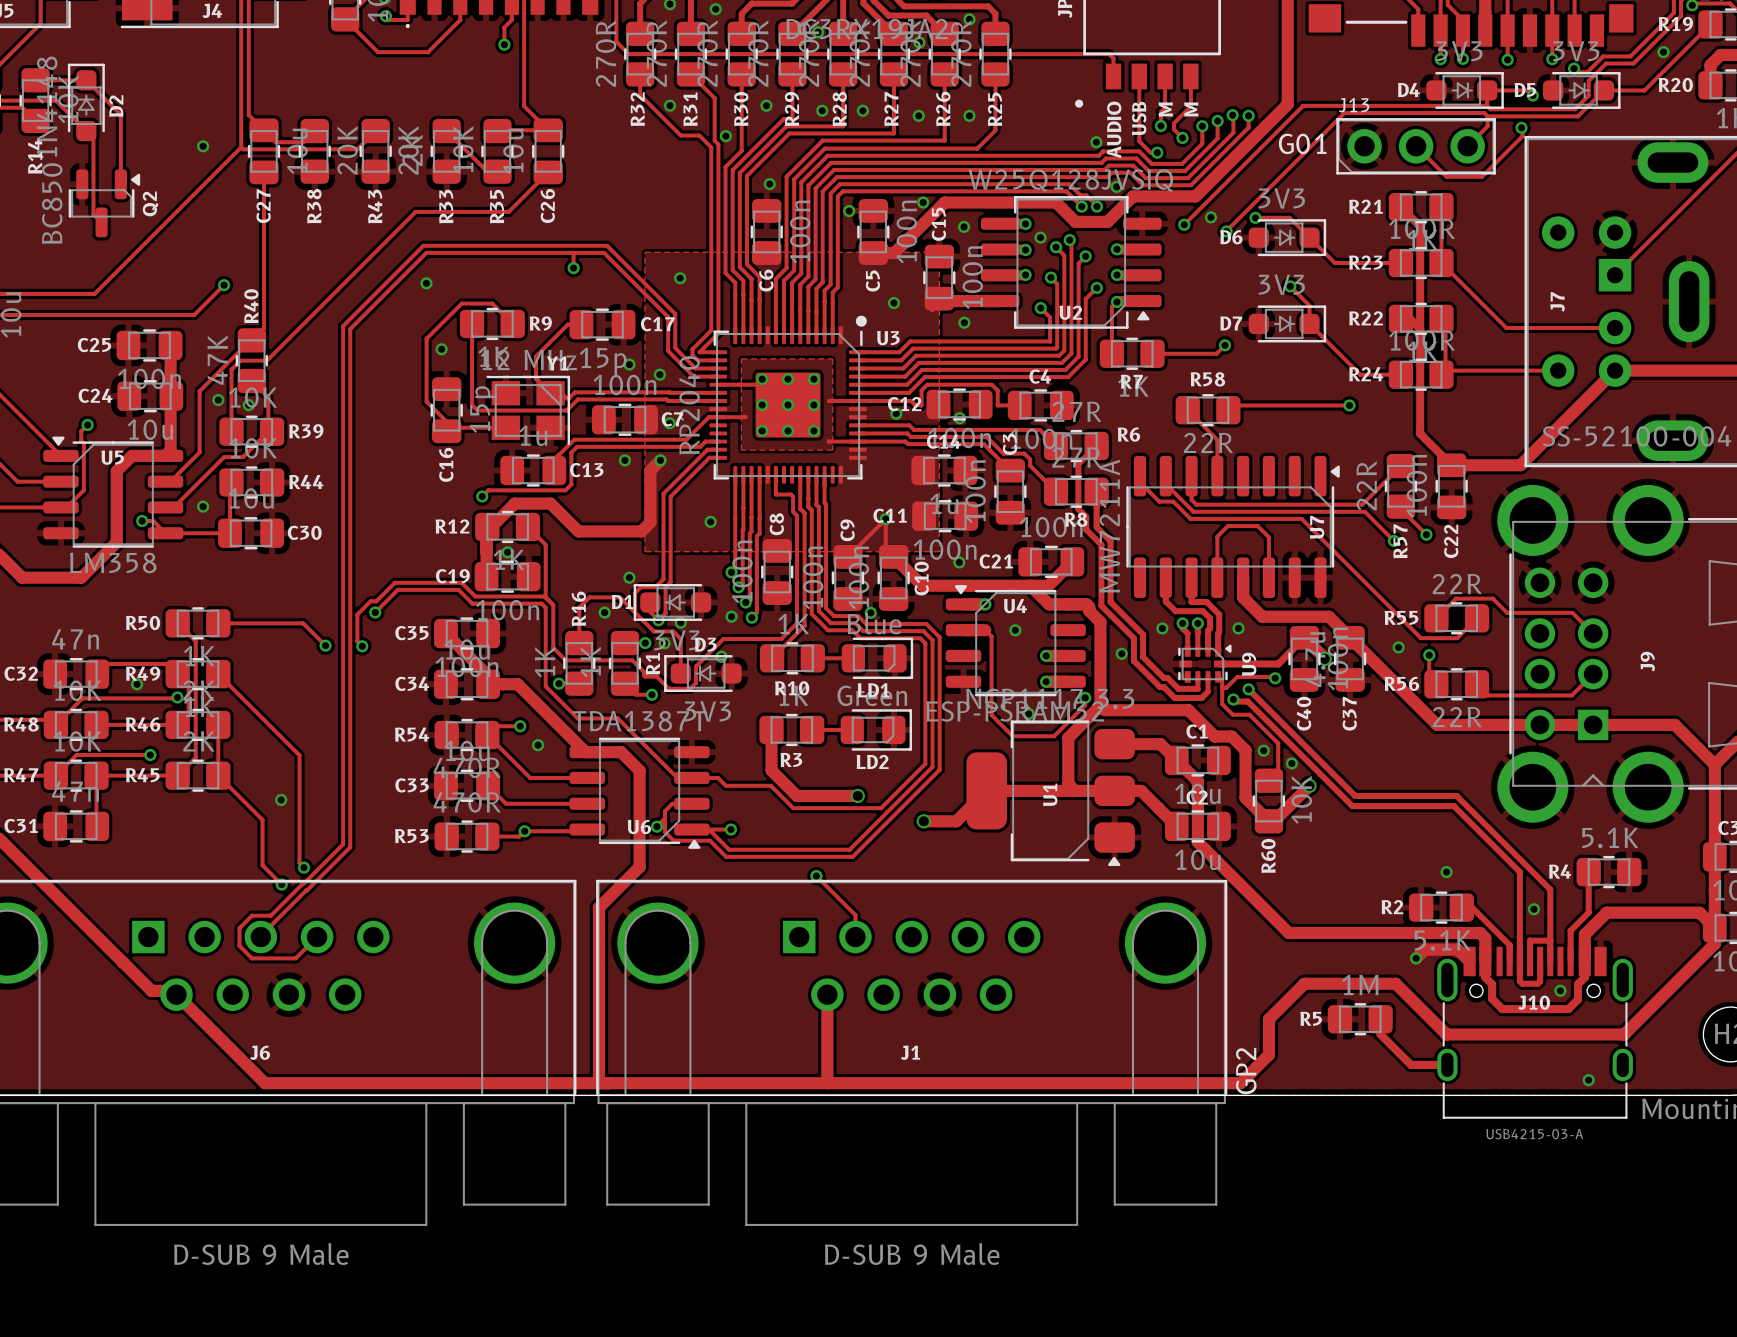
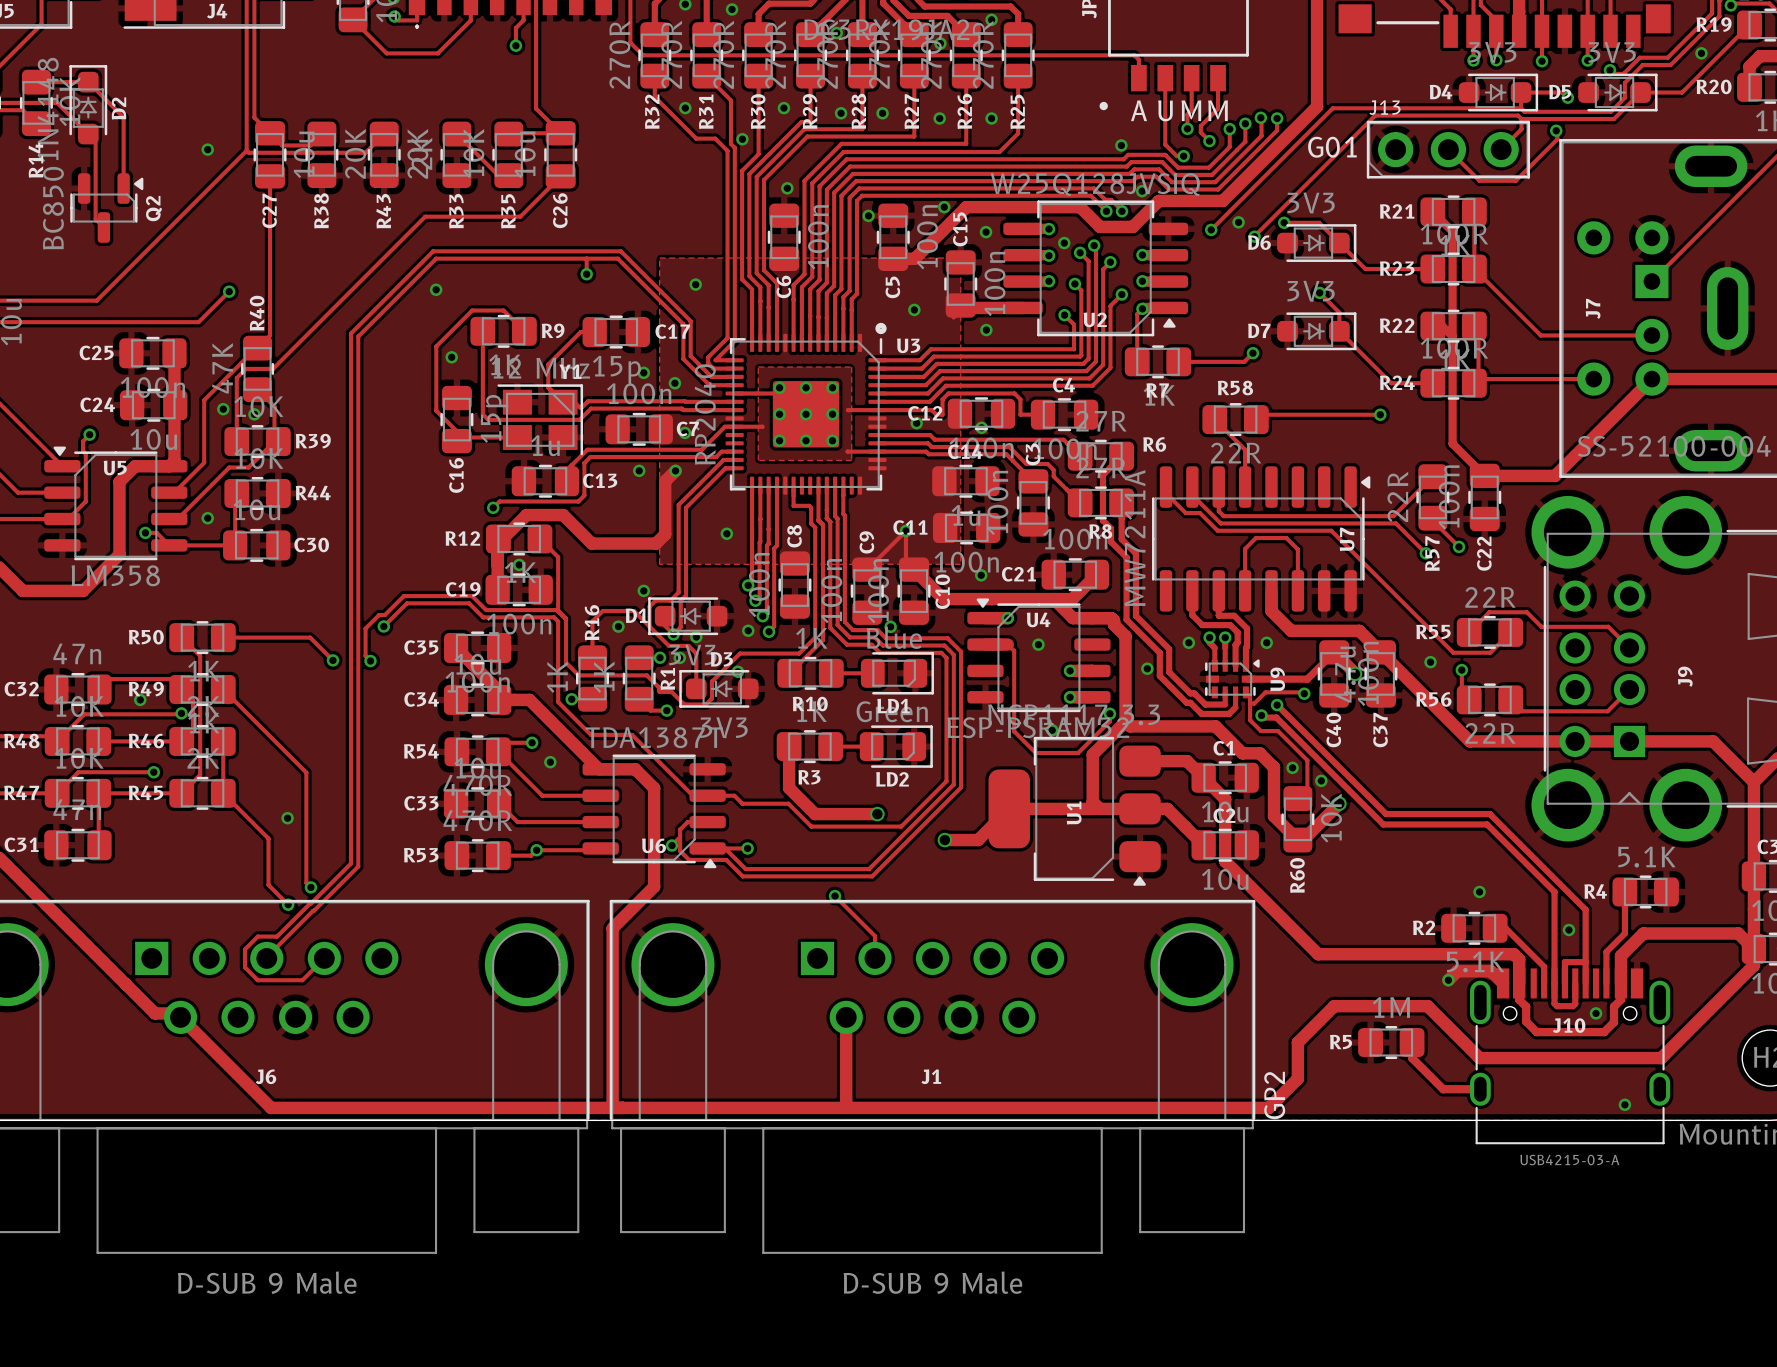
text: none -> A (1139, 110)
text: none -> U (1165, 110)
text: none -> M (1191, 110)
text: none -> M (1217, 110)
text: M (1165, 109) -> none
text: M (1191, 109) -> none
text: USB (1139, 118) -> none
text: AUDIO (1114, 129) -> none

